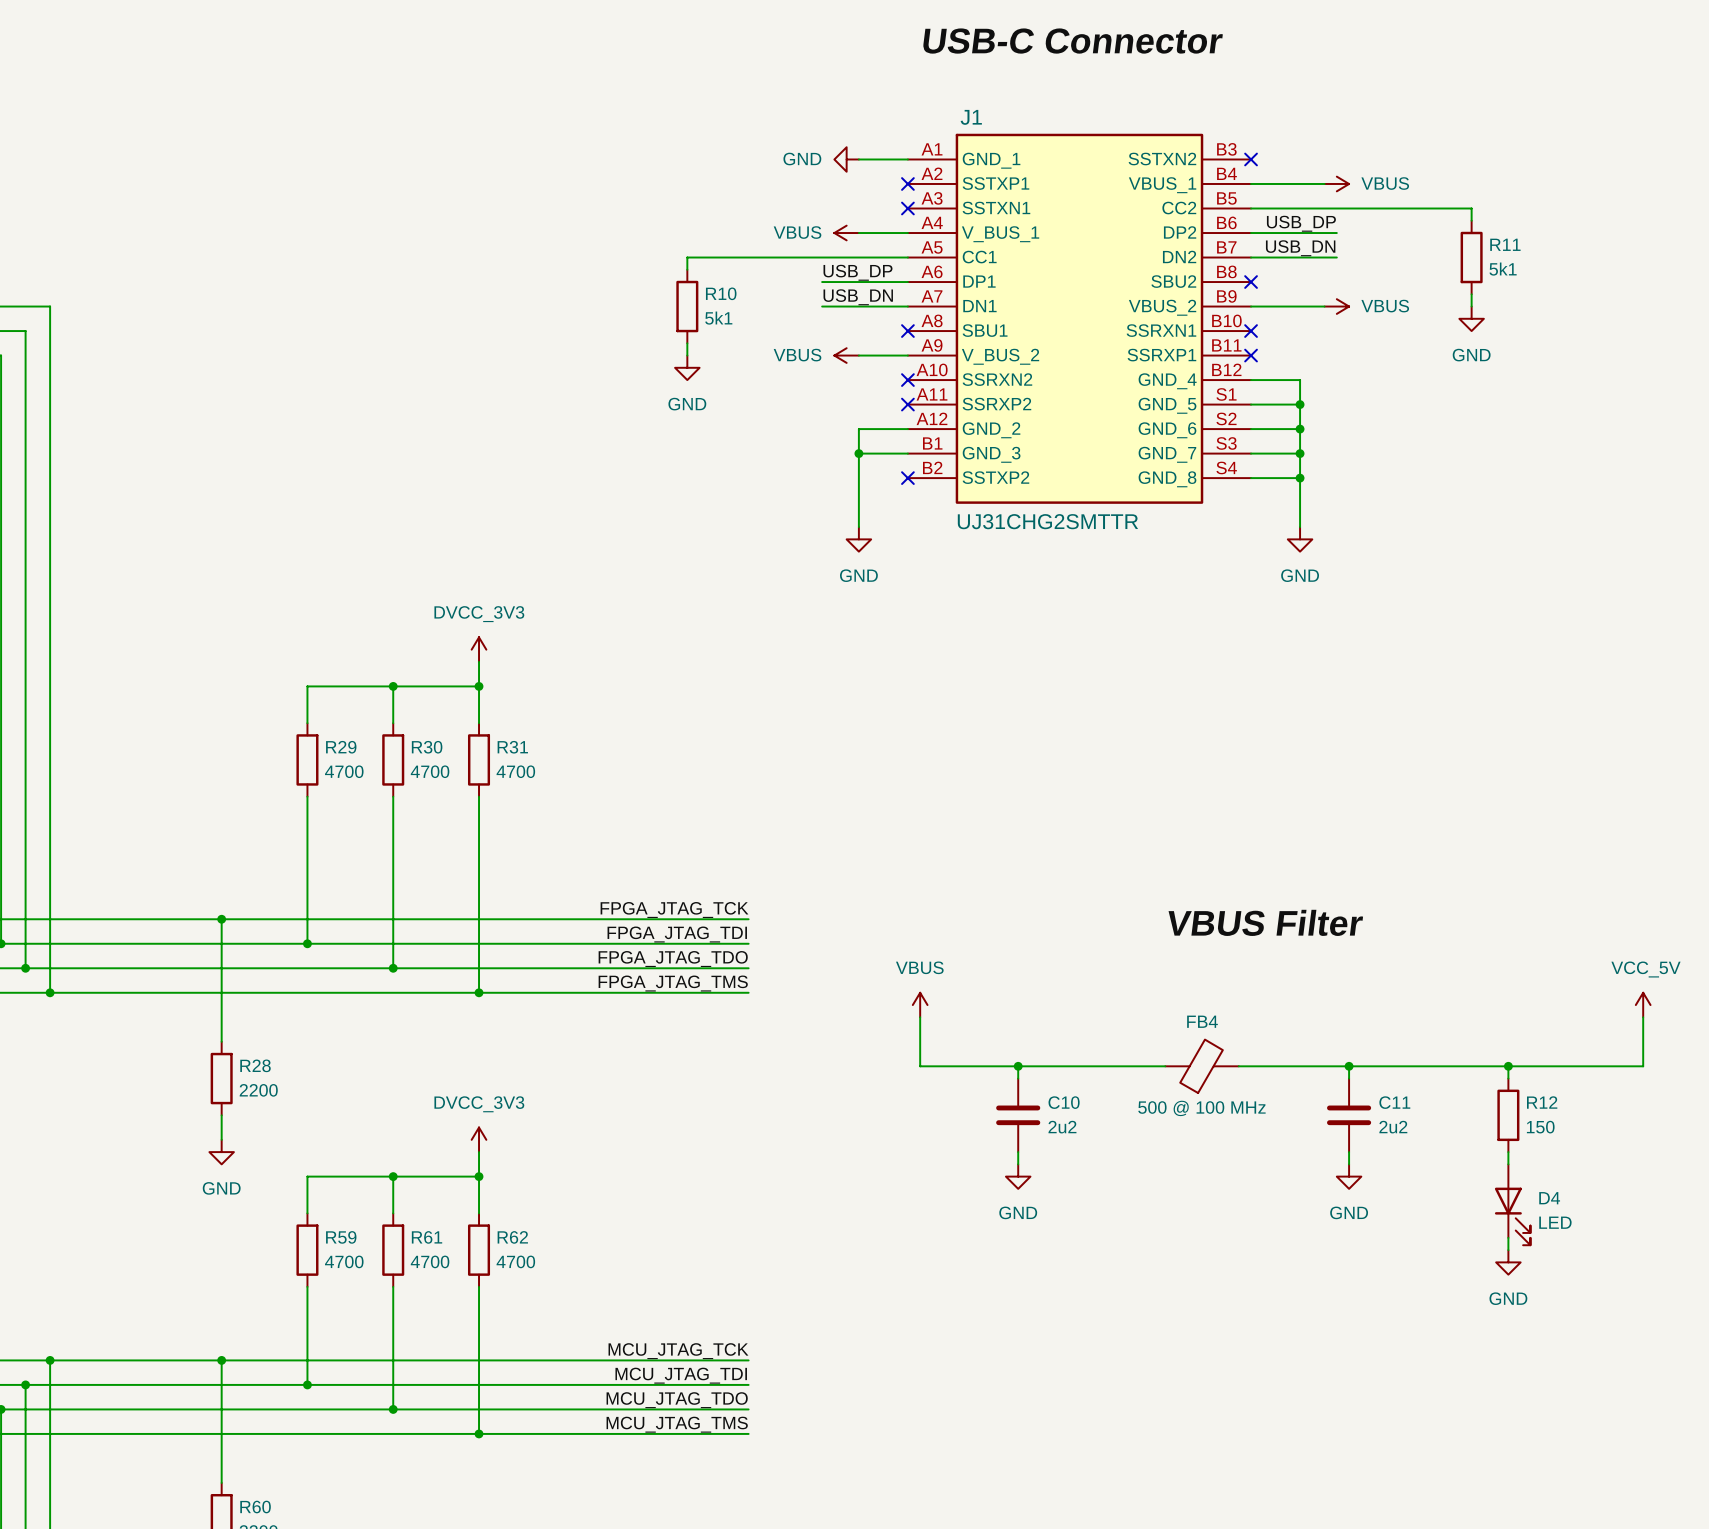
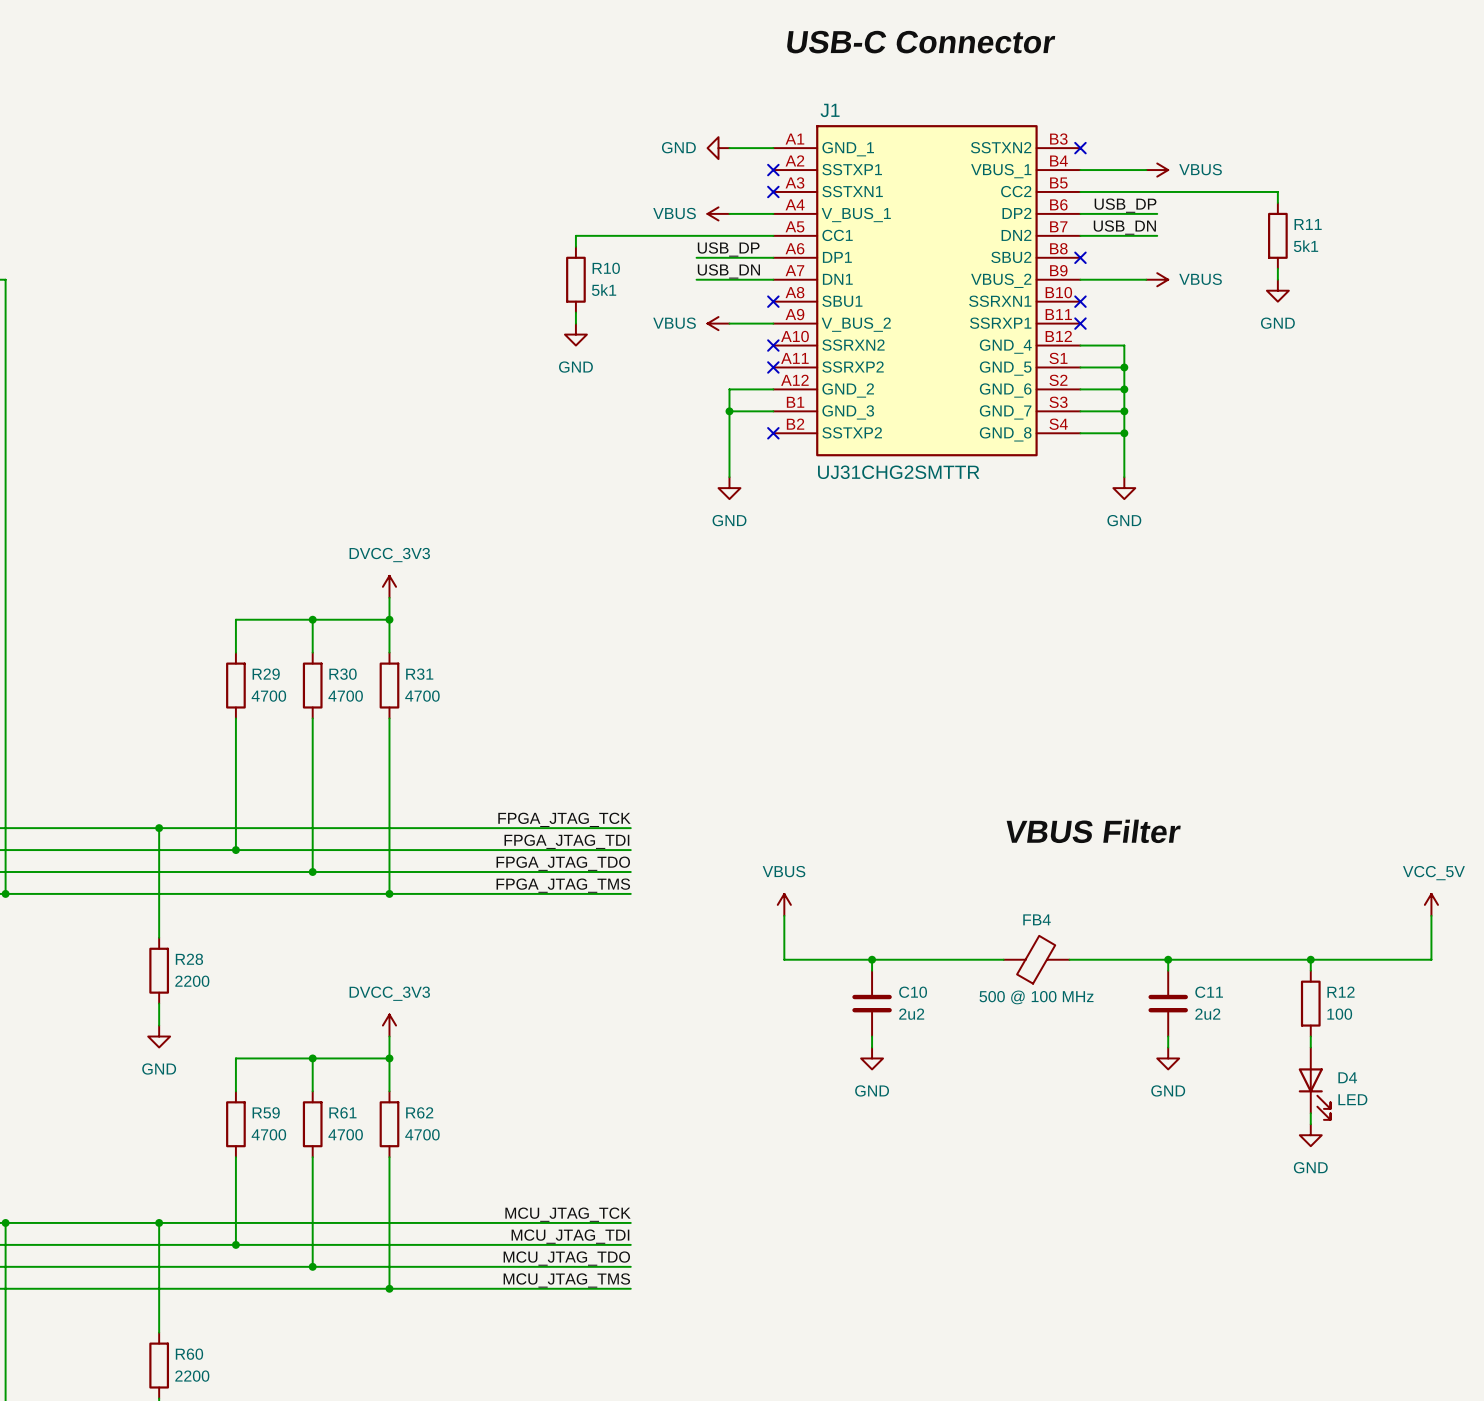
R12 value: 150 (1540, 1127) -> 100 (1339, 1014)

